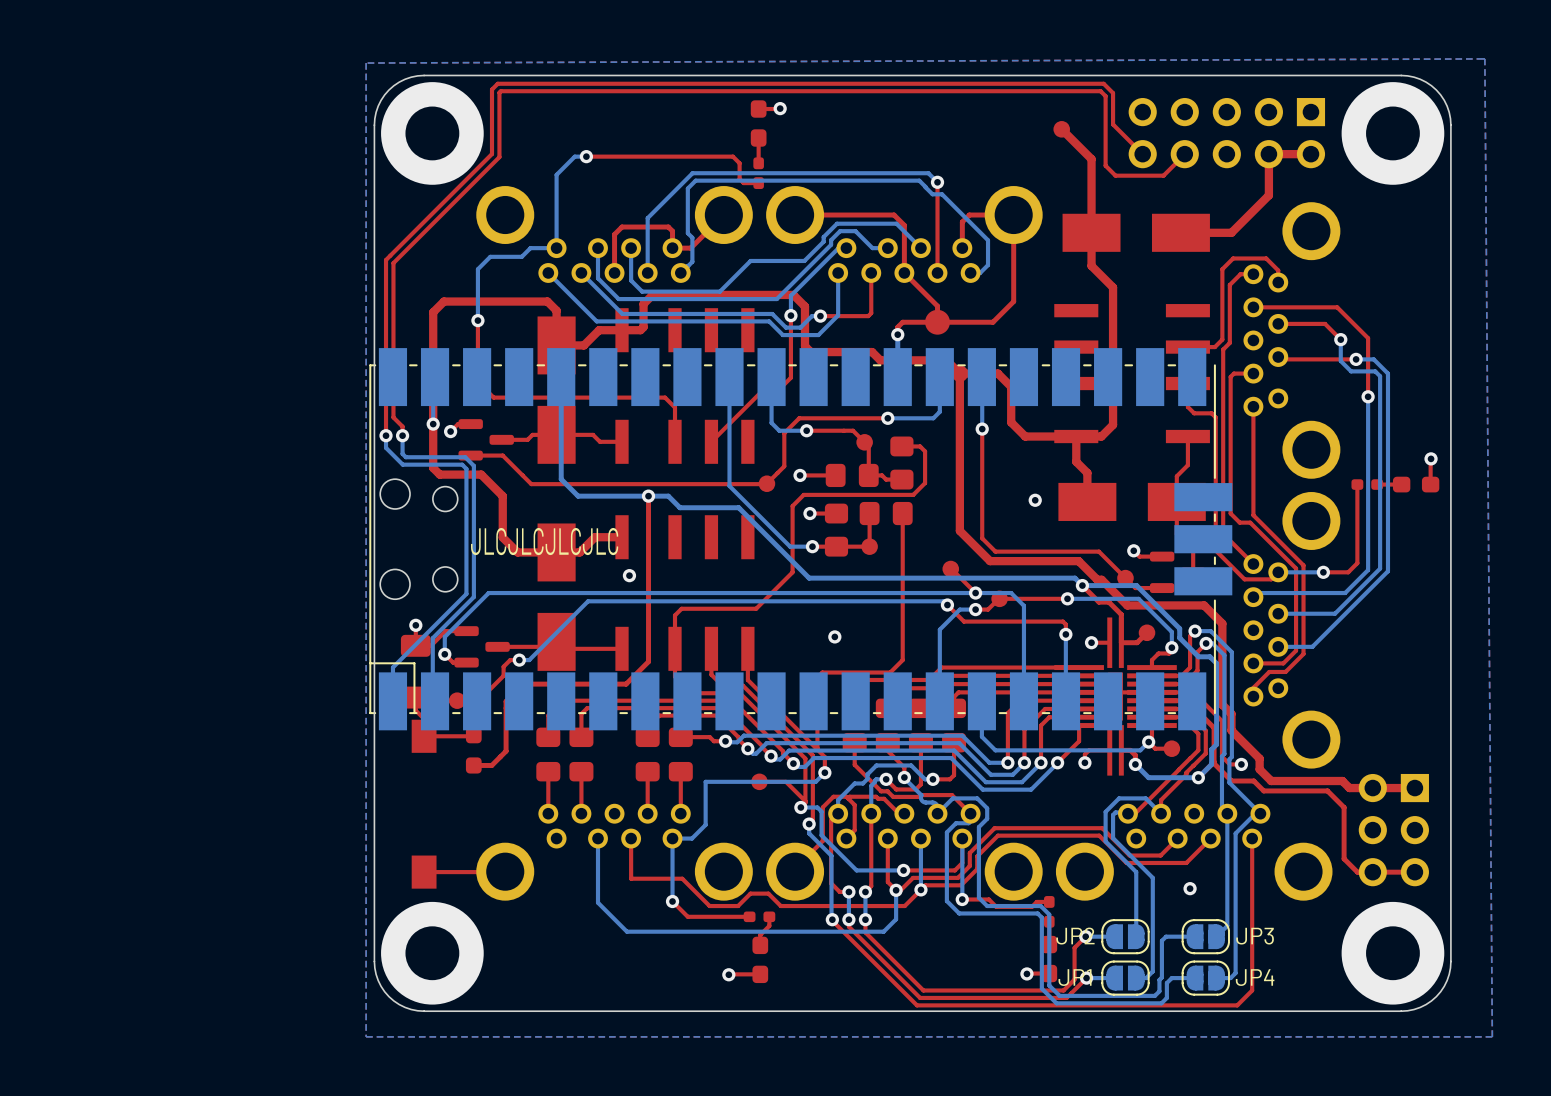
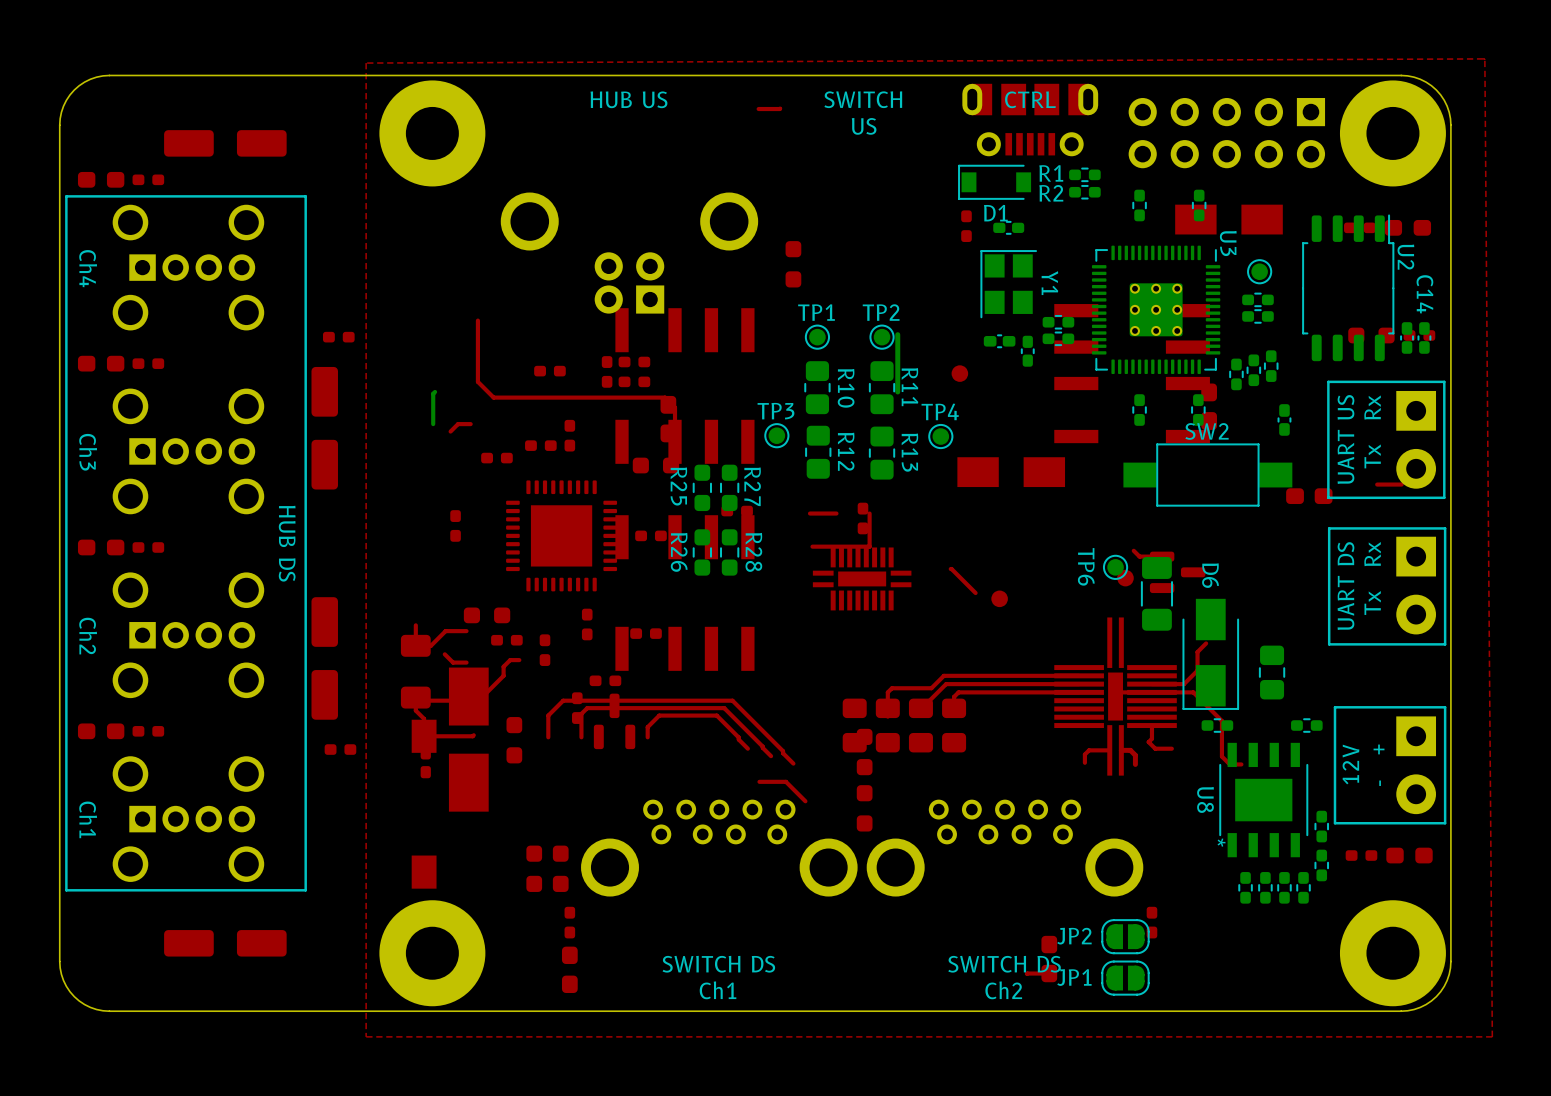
bottom zone outline: (1484, 58) (1492, 1036) (366, 1036) (366, 63) (1484, 58) -> none
board edge: (424, 75) (405, 79) (388, 90) (378, 106) (374, 125) (374, 961) (378, 980) (388, 996) (405, 1007) (424, 1011) -> (424, 75) (102, 75) (90, 79) (74, 90) (63, 106) (59, 125) (59, 961) (63, 980) (70, 991) (79, 1000) (90, 1007) (102, 1010) (424, 1011)
text: none -> HUB US (628, 99)
text: none -> SWITCH (863, 99)
text: none -> CTRL (1030, 99)
via: (780, 108) -> none
part: none -> (1030, 120)
part: (758, 123) -> none
text: none -> US (864, 126)
top track: (1061, 129) (1091, 159) (1091, 265) (1113, 287) (1113, 424) (1101, 436) (1025, 436) (1011, 422) (1011, 386) (997, 373) (959, 373) -> none
part: (1061, 129) -> none
part: none -> (432, 133)
via: (432, 133) -> none
part: none -> (1392, 133)
via: (1392, 133) -> none
top track: (758, 138) (758, 163) -> none
part: none -> (225, 143)
top track: (1142, 154) (1113, 124) (1113, 93) (1103, 83) (497, 83) (492, 89) (492, 154) (386, 260) (386, 435) -> none
top track: (1184, 154) (1163, 175) (1115, 175) (1105, 165) (1105, 96) (1100, 91) (500, 91) (499, 157) (393, 263) (393, 417) (402, 426) (402, 435) -> none
top track: (1310, 154) (1268, 154) (1268, 195) (1231, 232) (1180, 232) -> none
top track: (586, 156) (732, 156) (739, 163) (739, 178) (743, 183) (758, 183) -> none
bottom track: (586, 156) (574, 156) (556, 174) (556, 248) (530, 248) (521, 256) (490, 256) (477, 269) (477, 320) -> none
via: (586, 156) -> none
part: (758, 173) -> none
R1: none -> (1084, 174)
part: none -> (101, 179)
part: none -> (148, 179)
top track: (937, 182) (937, 272) -> none
bottom track: (937, 182) (928, 173) (692, 173) (647, 218) (647, 272) -> none
via: (937, 182) -> none
D1: none -> (994, 182)
R2: none -> (1084, 192)
line: none -> (305, 196) (66, 196) (66, 890) (305, 890) (305, 196)
part: none -> (1139, 205)
part: none -> (1199, 205)
top track: (723, 215) (690, 248) (672, 248) (672, 231) (668, 227) (622, 227) (614, 234) (614, 272) -> none
top track: (795, 215) (894, 215) (904, 225) (904, 272) (937, 306) (937, 322) -> none
part: none -> (1228, 219)
part: none -> (966, 226)
part: none -> (1008, 227)
part: none -> (1359, 227)
part: none -> (1407, 227)
part: (1136, 232) -> none
part: (614, 234) -> none
part: (904, 234) -> none
bottom track: (846, 248) (838, 248) (790, 295) (790, 315) -> none
bottom track: (887, 248) (872, 248) (855, 231) (840, 231) (831, 240) (831, 244) (776, 299) (618, 299) (598, 278) (598, 248) -> none
bottom track: (920, 248) (896, 223) (837, 223) (823, 237) (823, 241) (804, 260) (750, 260) (719, 291) (642, 291) (631, 280) (631, 248) -> none
top track: (962, 248) (962, 222) (969, 215) (1013, 215) (1013, 301) (992, 322) (902, 322) (897, 327) (897, 334) -> none
part: none -> (629, 253)
part: none -> (793, 264)
part: none -> (188, 267)
text: none -> Ch4 (88, 268)
part: none -> (1259, 271)
bottom track: (581, 272) (622, 313) (772, 313) (785, 327) (800, 327) (811, 316) (820, 316) -> none
bottom track: (838, 272) (838, 315) (818, 335) (782, 335) (769, 321) (596, 321) (548, 272) -> none
top track: (871, 272) (871, 313) (868, 316) (820, 316) -> none
bottom track: (970, 272) (980, 272) (988, 265) (988, 240) (942, 194) (932, 194) (919, 180) (695, 180) (687, 188) (687, 233) (692, 237) (692, 261) (680, 272) -> none
top track: (1253, 274) (1240, 274) (1229, 284) (1229, 342) (1223, 349) (1223, 533) (1253, 564) -> none
top track: (1278, 282) (1278, 270) (1266, 258) (1233, 258) (1222, 269) (1222, 339) (1214, 347) (1187, 347) -> none
Y1: none -> (1008, 284)
U2: none -> (1348, 287)
part: none -> (1257, 299)
top track: (1253, 307) (1337, 307) (1368, 338) (1368, 396) -> none
U3: none -> (1156, 309)
top track: (790, 315) (790, 377) (782, 386) (767, 386) (711, 441) -> none
via: (790, 315) -> none
via: (820, 316) -> none
part: none -> (1257, 316)
via: (477, 320) -> none
part: (937, 322) -> none
part: none -> (1058, 322)
top track: (1278, 323) (1325, 323) (1340, 339) -> none
via: (897, 334) -> none
part: none -> (1371, 335)
part: none -> (1419, 335)
part: none -> (338, 337)
TP1: none -> (817, 337)
TP2: none -> (882, 337)
part: none -> (1407, 337)
C14: none -> (1424, 337)
part: none -> (1058, 338)
bottom track: (1340, 339) (1340, 361) (1351, 371) (1375, 371) (1380, 376) (1380, 568) (1334, 613) (1278, 613) -> none
via: (1340, 339) -> none
part: (1291, 340) -> none
part: none -> (999, 341)
part: none -> (1027, 351)
top track: (1278, 357) (1280, 359) (1356, 359) -> none
bottom track: (1356, 359) (1373, 359) (1387, 373) (1387, 571) (1312, 646) (1278, 646) -> none
via: (1356, 359) -> none
part: none -> (634, 361)
part: none -> (101, 363)
part: none -> (148, 363)
part: none -> (1271, 366)
part: none -> (1253, 370)
part: none -> (549, 371)
part: none -> (607, 371)
top track: (959, 373) (959, 530) (990, 561) (1078, 561) (1097, 579) (1101, 579) (1127, 605) (1204, 605) (1222, 623) (1222, 704) (1231, 713) (1231, 730) (1259, 758) (1259, 769) (1271, 781) (1342, 781) (1349, 788) (1414, 788) -> none
top track: (959, 373) (946, 360) (880, 360) (872, 352) (810, 352) (805, 346) (805, 306) (793, 294) (652, 294) (643, 304) (643, 327) (640, 330) (599, 330) (583, 345) (556, 345) (556, 310) (547, 301) (443, 301) (433, 312) (433, 467) (439, 474) (481, 474) (502, 496) (502, 537) (517, 552) (579, 552) (595, 537) (622, 537) -> none
top track: (1253, 373) (1233, 373) (1230, 376) (1230, 513) (1239, 522) (1250, 522) (1296, 568) (1296, 650) (1283, 663) (1253, 663) -> none
part: none -> (1236, 374)
part: none -> (634, 381)
line: none -> (1444, 381) (1328, 381) (1328, 497) (1444, 497) (1444, 381)
top track: (1187, 383) (1187, 407) (1194, 413) (1211, 413) (1215, 417) (1215, 550) (1244, 579) (1271, 579) (1278, 572) -> none
R10: none -> (817, 387)
R11: none -> (882, 387)
part: (556, 390) -> none
bottom track: (561, 391) (561, 479) (578, 496) (668, 496) (679, 507) (738, 507) (809, 578) (1074, 578) (1082, 585) (1136, 585) (1179, 628) (1179, 637) (1198, 656) (1209, 656) (1216, 663) (1216, 744) (1211, 749) (1211, 764) (1198, 777) (1148, 777) (1135, 764) -> none
bottom track: (729, 391) (729, 486) (790, 546) (812, 546) -> none
bottom track: (771, 391) (771, 422) (779, 430) (806, 430) -> none
bottom track: (939, 391) (939, 411) (933, 418) (887, 418) -> none
bottom track: (981, 391) (982, 429) -> none
bottom track: (1368, 396) (1368, 570) (1345, 593) (1262, 593) (1257, 597) (1253, 597) -> none
via: (1368, 396) -> none
part: none -> (1209, 406)
top track: (1253, 406) (1253, 515) (1303, 565) (1303, 654) (1285, 671) (1269, 671) (1253, 687) (1253, 696) -> none
part: none -> (1139, 410)
part: none -> (1198, 410)
top track: (887, 418) (799, 418) (784, 433) (784, 466) (766, 484) (531, 484) (502, 455) (470, 455) -> none
via: (887, 418) -> none
part: none -> (668, 419)
part: none -> (1284, 419)
via: (433, 424) -> none
part: none -> (324, 428)
top track: (982, 429) (982, 538) (995, 551) (1098, 551) (1135, 588) (1162, 588) -> none
via: (982, 429) -> none
top track: (806, 430) (853, 430) (868, 446) (868, 475) (882, 475) (886, 479) (901, 479) -> none
via: (806, 430) -> none
via: (450, 431) -> none
text: none -> Tx Rx (1372, 431)
bottom track: (386, 435) (386, 447) (402, 464) (462, 464) (466, 468) (466, 593) (392, 667) (392, 686) -> none
via: (386, 435) -> none
bottom track: (402, 435) (402, 453) (405, 457) (465, 457) (473, 465) (473, 597) (432, 638) (432, 684) (435, 686) -> none
via: (402, 435) -> none
part: none -> (569, 435)
TP3: none -> (776, 435)
TP4: none -> (940, 436)
top track: (1076, 436) (1076, 461) (1087, 472) (1087, 501) -> none
top track: (1187, 436) (1187, 465) (1176, 476) (1176, 534) (1193, 550) (1193, 572) -> none
part: (486, 439) -> none
top track: (501, 439) (527, 439) (532, 434) (593, 434) (599, 441) (622, 441) -> none
text: none -> UART US (1345, 439)
part: none -> (1416, 439)
part: (864, 442) -> none
part: none -> (540, 445)
top track: (901, 446) (920, 446) (925, 451) (925, 483) (913, 494) (803, 494) (792, 506) (792, 572) (756, 608) (681, 608) (675, 615) (675, 676) (691, 693) (740, 693) (805, 758) (805, 802) (800, 807) -> none
part: none -> (188, 451)
R12: none -> (818, 452)
text: none -> Ch3 (88, 452)
R13: none -> (882, 453)
part: none -> (496, 458)
top track: (1431, 458) (1430, 484) -> none
via: (1431, 458) -> none
part: (901, 463) -> none
part: none -> (655, 465)
part: none -> (1011, 472)
via: (800, 475) -> none
top track: (835, 475) (800, 475) -> none
part: (852, 475) -> none
SW2: none -> (1207, 475)
part: (766, 483) -> none
top track: (1357, 484) (1357, 563) (1348, 572) (1323, 572) -> none
part: (1367, 484) -> none
part: (1416, 484) -> none
R25: none -> (702, 487)
R27: none -> (729, 487)
top track: (648, 496) (648, 661) (626, 684) (523, 684) (506, 701) (506, 751) (491, 765) (473, 765) -> none
via: (648, 496) -> none
part: none -> (1309, 496)
via: (1035, 500) -> none
part: (1132, 501) -> none
part: none -> (737, 511)
via: (809, 513) -> none
part: (886, 513) -> none
top track: (902, 513) (902, 660) (890, 672) (822, 672) (817, 677) (816, 748) -> none
part: none -> (862, 518)
part: none -> (455, 525)
line: none -> (1445, 528) (1329, 528) (1329, 644) (1445, 644) (1445, 528)
part: (836, 530) -> none
part: none -> (561, 535)
part: none -> (650, 535)
part: (800, 539) -> none
text: JLCJLCJLCJLC (544, 541) -> none
text: none -> HUB DS (287, 543)
via: (812, 546) -> none
part: (869, 546) -> none
part: none -> (101, 547)
part: none -> (148, 547)
via: (1133, 550) -> none
R26: none -> (702, 552)
R28: none -> (729, 552)
TP6: none -> (1115, 567)
part: (950, 569) -> none
bottom track: (1323, 572) (1278, 572) -> none
via: (1323, 572) -> none
via: (629, 575) -> none
part: none -> (862, 578)
text: none -> Tx Rx (1372, 578)
top track: (1082, 585) (1098, 602) (1108, 602) (1121, 614) (1121, 642) (1137, 642) (1147, 632) -> none
via: (1082, 585) -> none
part: none -> (1416, 585)
text: none -> UART DS (1345, 586)
via: (975, 593) -> none
part: none -> (1156, 593)
part: (556, 597) -> none
top track: (1067, 598) (998, 598) (988, 609) (975, 609) -> none
bottom track: (1067, 598) (1138, 598) (1171, 631) (1171, 647) -> none
via: (1067, 598) -> none
top track: (947, 605) (964, 621) (1062, 621) (1065, 624) (1065, 634) -> none
bottom track: (947, 605) (943, 601) (588, 601) (529, 660) (519, 660) -> none
via: (947, 605) -> none
bottom track: (975, 609) (959, 609) (939, 629) (939, 686) -> none
via: (975, 609) -> none
part: none -> (487, 615)
part: none -> (587, 624)
via: (415, 625) -> none
part: (1291, 630) -> none
top track: (1195, 631) (1190, 636) (1190, 667) (1181, 675) (1151, 675) -> none
bottom track: (1195, 631) (1210, 631) (1231, 652) (1231, 757) (1229, 759) (1229, 782) (1260, 813) (1255, 813) (1235, 833) (1235, 973) (1230, 978) (1216, 978) -> none
via: (1195, 631) -> none
part: (1147, 632) -> none
part: none -> (646, 633)
bottom track: (1065, 634) (1065, 686) -> none
via: (1065, 634) -> none
part: none -> (188, 635)
via: (834, 636) -> none
text: none -> Ch2 (88, 636)
part: none -> (506, 640)
via: (1091, 642) -> none
top track: (1109, 642) (1091, 642) -> none
bottom track: (1206, 643) (1212, 643) (1224, 655) (1224, 753) (1221, 756) (1221, 808) (1227, 813) (1227, 925) (1216, 936) -> none
via: (1206, 643) -> none
part rotation: 0° (482, 646) -> 90° counterclockwise (614, 721)
part position: (482, 646) -> (614, 721)
top track: (497, 646) (551, 646) (556, 641) (563, 648) (622, 648) -> none
top track: (1171, 647) (1169, 653) (1158, 653) (1151, 660) (1151, 667) -> none
via: (1171, 647) -> none
top track: (711, 648) (711, 674) (722, 685) (742, 685) (812, 755) (812, 820) (809, 824) -> none
top track: (747, 648) (747, 680) (824, 757) (824, 772) -> none
part: none -> (545, 650)
bottom track: (444, 654) (444, 636) (488, 593) (1011, 593) (1023, 605) (1023, 686) -> none
via: (444, 654) -> none
D6: none -> (1210, 654)
part: none -> (324, 658)
via: (519, 660) -> none
top track: (1079, 667) (941, 667) (929, 679) (858, 679) (854, 684) (854, 708) -> none
part: none -> (1272, 672)
part: none -> (605, 680)
bottom track: (981, 686) (981, 736) (995, 750) (1140, 750) (1148, 742) -> none
part: (457, 700) -> none
top track: (1079, 700) (1020, 700) (1007, 713) (1007, 762) -> none
top track: (1151, 700) (1186, 700) (1214, 727) (1213, 762) (1231, 781) (1253, 781) (1263, 790) (1327, 790) (1344, 807) (1344, 858) (1357, 872) (1414, 872) -> none
line: none -> (1445, 707) (1445, 823) (1334, 823) (1334, 707) (1445, 707)
part: none -> (577, 708)
top track: (1079, 708) (1045, 708) (1024, 729) (1024, 762) -> none
top track: (1151, 708) (1184, 708) (1205, 730) (1205, 753) (1193, 765) -> none
top track: (1079, 717) (1049, 717) (1041, 725) (1041, 762) -> none
top track: (1151, 717) (1181, 717) (1198, 733) (1198, 750) (1190, 758) -> none
top track: (1079, 725) (1079, 741) (1057, 762) -> none
part: none -> (1217, 725)
part: none -> (1306, 725)
part footprint: [465, 727, 482, 774] -> [448, 667, 489, 812]
part: none -> (101, 731)
part: none -> (148, 731)
bottom track: (743, 735) (962, 735) (989, 762) (1007, 762) -> none
bottom track: (743, 735) (737, 742) (726, 742) -> none
top track: (681, 737) (709, 737) (713, 741) (725, 741) -> none
part: none -> (514, 740)
via: (725, 741) -> none
top track: (954, 742) (954, 775) (949, 779) (932, 779) -> none
via: (1148, 742) -> none
bottom track: (747, 748) (752, 753) (756, 753) (766, 743) (959, 743) (990, 774) (1012, 774) (1024, 762) -> none
via: (747, 748) -> none
part: (1171, 748) -> none
part: none -> (340, 749)
top track: (854, 750) (854, 764) (881, 791) (887, 791) (893, 796) (952, 795) (970, 813) -> none
top track: (887, 750) (904, 767) (904, 777) -> none
top track: (920, 750) (920, 784) (915, 789) (896, 789) (886, 779) -> none
part: none -> (864, 752)
part: (548, 754) -> none
part: (581, 754) -> none
part: (647, 754) -> none
part: (680, 754) -> none
bottom track: (771, 756) (774, 759) (780, 759) (789, 750) (954, 750) (985, 782) (1021, 782) (1041, 762) -> none
via: (771, 756) -> none
top track: (1190, 758) (1178, 769) -> none
part: none -> (425, 762)
via: (1007, 762) -> none
via: (1024, 762) -> none
via: (1041, 762) -> none
bottom track: (1057, 762) (1031, 789) (982, 789) (951, 758) (813, 758) (805, 766) (796, 766) (793, 763) -> none
via: (1057, 762) -> none
via: (1084, 762) -> none
via: (793, 763) -> none
via: (1135, 764) -> none
via: (1241, 764) -> none
text: none -> 12V (1350, 764)
top track: (1193, 765) (1161, 800) (1161, 813) -> none
text: none -> - + (1379, 765)
part: none -> (1416, 765)
top track: (1178, 769) (1135, 813) (1127, 813) -> none
top track: (548, 771) (548, 813) -> none
top track: (581, 771) (581, 813) -> none
top track: (647, 771) (647, 813) -> none
top track: (680, 771) (680, 813) -> none
bottom track: (824, 772) (815, 781) (705, 781) (705, 824) (691, 838) (672, 838) (672, 901) -> none
via: (824, 772) -> none
bottom track: (904, 777) (921, 795) (922, 801) (936, 803) (937, 813) (952, 798) (977, 798) (987, 808) (987, 818) (978, 827) (978, 897) (987, 906) (1040, 906) (1049, 914) (1049, 985) (1059, 995) (1154, 995) (1159, 991) (1159, 979) (1161, 977) (1161, 940) (1166, 936) (1195, 936) -> none
via: (904, 777) -> none
via: (1198, 777) -> none
bottom track: (886, 779) (876, 779) (871, 785) (871, 813) -> none
via: (886, 779) -> none
bottom track: (932, 779) (925, 779) (911, 765) (876, 765) (867, 774) (867, 778) (862, 783) (854, 783) (838, 800) (838, 813) -> none
via: (932, 779) -> none
part: (759, 781) -> none
top track: (848, 798) (849, 796) (876, 796) (884, 798) (899, 813) (904, 813) -> none
U8: none -> (1263, 800)
bottom track: (800, 807) (817, 807) (821, 811) (821, 835) (856, 870) (903, 870) -> none
via: (800, 807) -> none
part: none -> (864, 808)
top track: (838, 813) (831, 820) (831, 883) (839, 891) (848, 891) -> none
top track: (871, 813) (871, 886) (865, 891) -> none
bottom track: (970, 813) (970, 821) (968, 823) (956, 823) (946, 832) (946, 901) (959, 913) (1037, 913) (1041, 917) (1041, 988) (1056, 1003) (1161, 1003) (1166, 997) (1166, 983) (1171, 978) (1195, 978) -> none
bottom track: (1127, 813) (1115, 812) (1113, 814) (1113, 838) (1152, 877) (1152, 971) (1146, 978) (1136, 978) -> none
bottom track: (1161, 813) (1145, 798) (1119, 798) (1105, 811) (1105, 841) (1136, 872) (1136, 936) -> none
part: none -> (188, 819)
text: none -> Ch1 (88, 819)
bottom track: (809, 824) (809, 833) (831, 855) (832, 919) -> none
via: (809, 824) -> none
part: none -> (1321, 826)
part: (1393, 830) -> none
bottom track: (598, 838) (598, 902) (626, 931) (883, 931) (896, 919) (896, 890) -> none
top track: (846, 838) (854, 830) (854, 805) (846, 796) (833, 796) (822, 807) (822, 841) (795, 868) (795, 871) -> none
bottom track: (920, 838) (920, 889) -> none
top track: (962, 838) (962, 862) (954, 870) (903, 870) -> none
bottom track: (962, 838) (962, 899) -> none
top track: (1177, 838) (1160, 855) (1129, 855) (1102, 828) (994, 828) (969, 853) (969, 866) (957, 877) (913, 877) (900, 890) (896, 890) (887, 882) (887, 838) -> none
top track: (1210, 838) (1186, 862) (1126, 862) (1099, 835) (997, 835) (977, 856) (977, 869) (961, 885) (925, 885) (904, 906) (780, 906) (768, 893) (750, 893) (738, 906) (709, 906) (682, 878) (631, 878) (631, 838) -> none
top track: (1252, 838) (1252, 990) (1237, 1005) (917, 1005) (832, 919) -> none
part: none -> (719, 848)
part: none -> (1005, 848)
part: (614, 852) -> none
part: (904, 852) -> none
part: (1194, 852) -> none
part: none -> (1361, 855)
part: none -> (1409, 855)
part: none -> (1321, 865)
part: none -> (534, 868)
part: none -> (560, 868)
via: (903, 870) -> none
top track: (505, 871) (424, 872) -> none
part: none -> (1245, 887)
part: none -> (1265, 887)
part: none -> (1284, 887)
part: none -> (1303, 887)
via: (1190, 888) -> none
via: (920, 889) -> none
via: (896, 890) -> none
bottom track: (848, 891) (848, 919) -> none
via: (848, 891) -> none
bottom track: (865, 891) (865, 919) -> none
via: (865, 891) -> none
top track: (962, 899) (988, 899) (996, 906) (1031, 906) (1036, 901) (1049, 901) -> none
via: (962, 899) -> none
top track: (672, 901) (687, 916) (749, 916) -> none
via: (672, 901) -> none
part position: (1049, 911) -> (1151, 922)
part: (759, 916) -> none
top track: (769, 916) (769, 925) (760, 935) (760, 945) -> none
via: (832, 919) -> none
top track: (848, 919) (848, 926) (920, 997) (1066, 997) (1086, 978) -> none
via: (848, 919) -> none
top track: (865, 919) (865, 932) (923, 990) (1063, 990) (1074, 979) (1074, 947) (1085, 936) -> none
via: (865, 919) -> none
part: none -> (569, 922)
via: (1085, 936) -> none
bottom track: (1114, 936) (1085, 936) -> none
JP3: (1205, 936) -> none
part: none -> (225, 943)
part: none -> (432, 953)
via: (432, 953) -> none
part: none -> (1392, 953)
via: (1392, 953) -> none
part position: (760, 959) -> (569, 969)
text: none -> SWITCH DS (718, 964)
text: none -> SWITCH DS (1004, 964)
via: (1026, 973) -> none
via: (728, 974) -> none
top track: (760, 974) (728, 974) -> none
via: (1086, 978) -> none
bottom track: (1114, 978) (1086, 978) -> none
JP4: (1205, 978) -> none
text: none -> Ch1 (718, 990)
text: none -> Ch2 (1003, 990)

